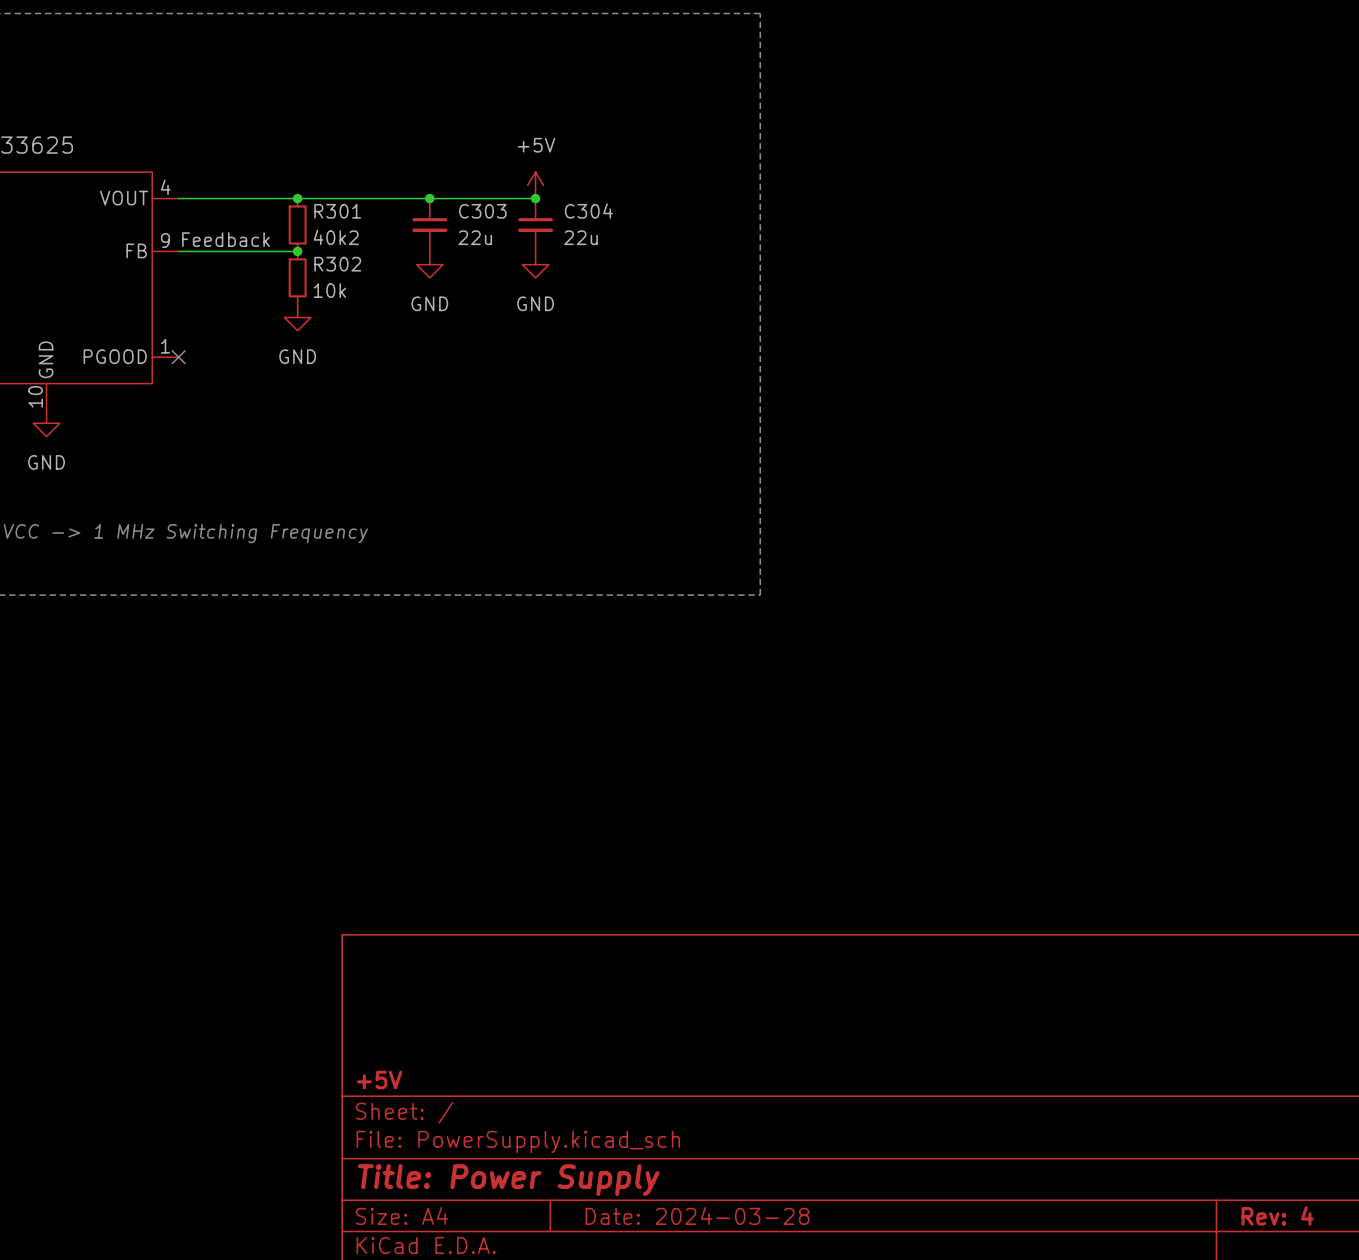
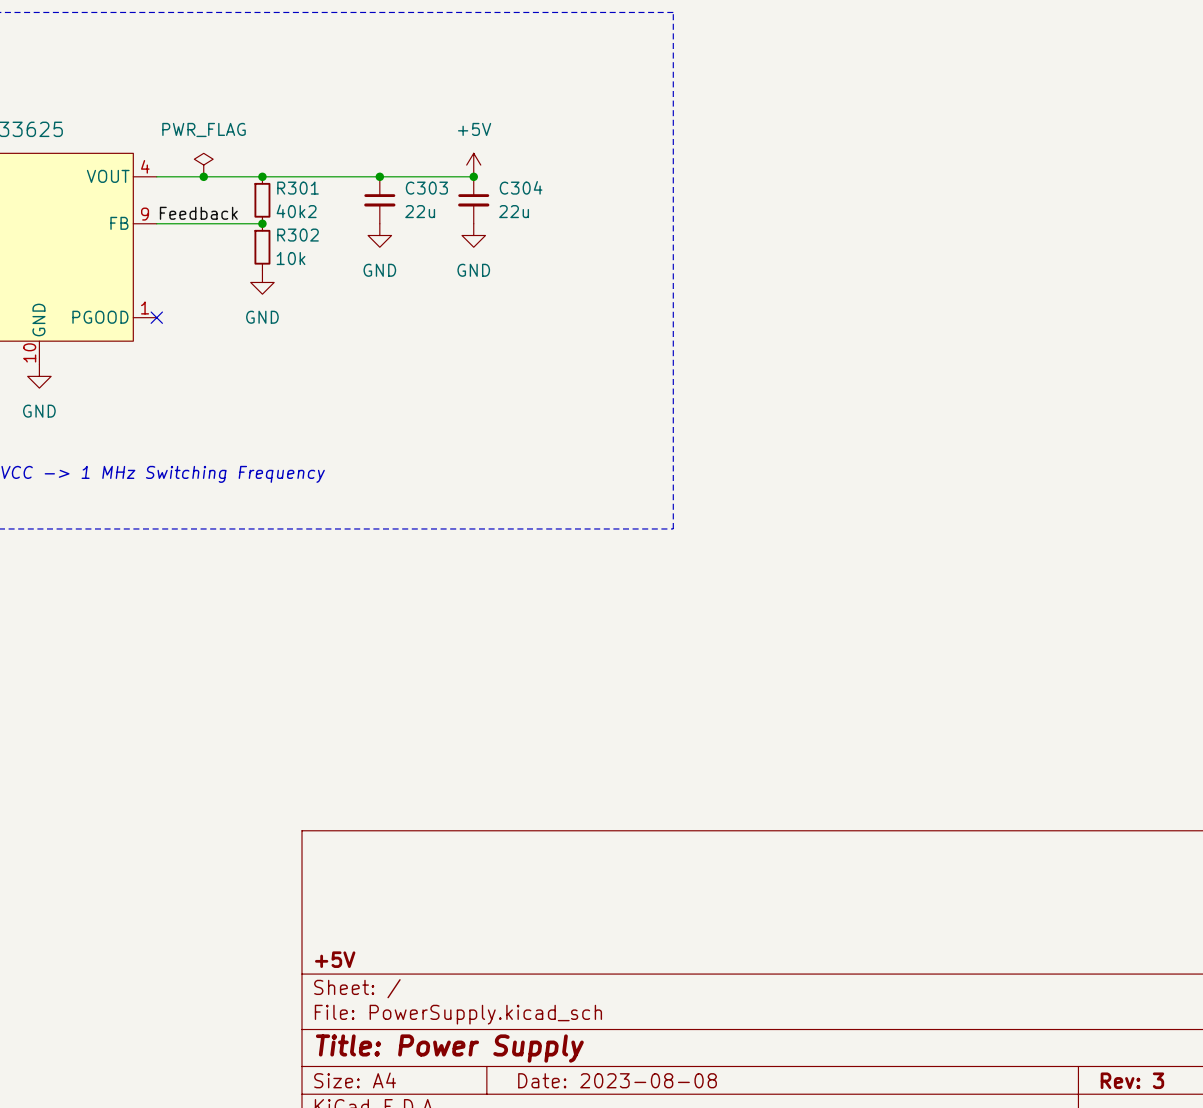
power symbol: none -> PWR_FLAG (203, 165)
junction: none -> (203, 176)
title block: Date: 2024-03-28 (697, 1215) -> Date: 2023-08-08 (617, 1080)
title block: Rev: 4 (1277, 1215) -> Rev: 3 (1132, 1080)

